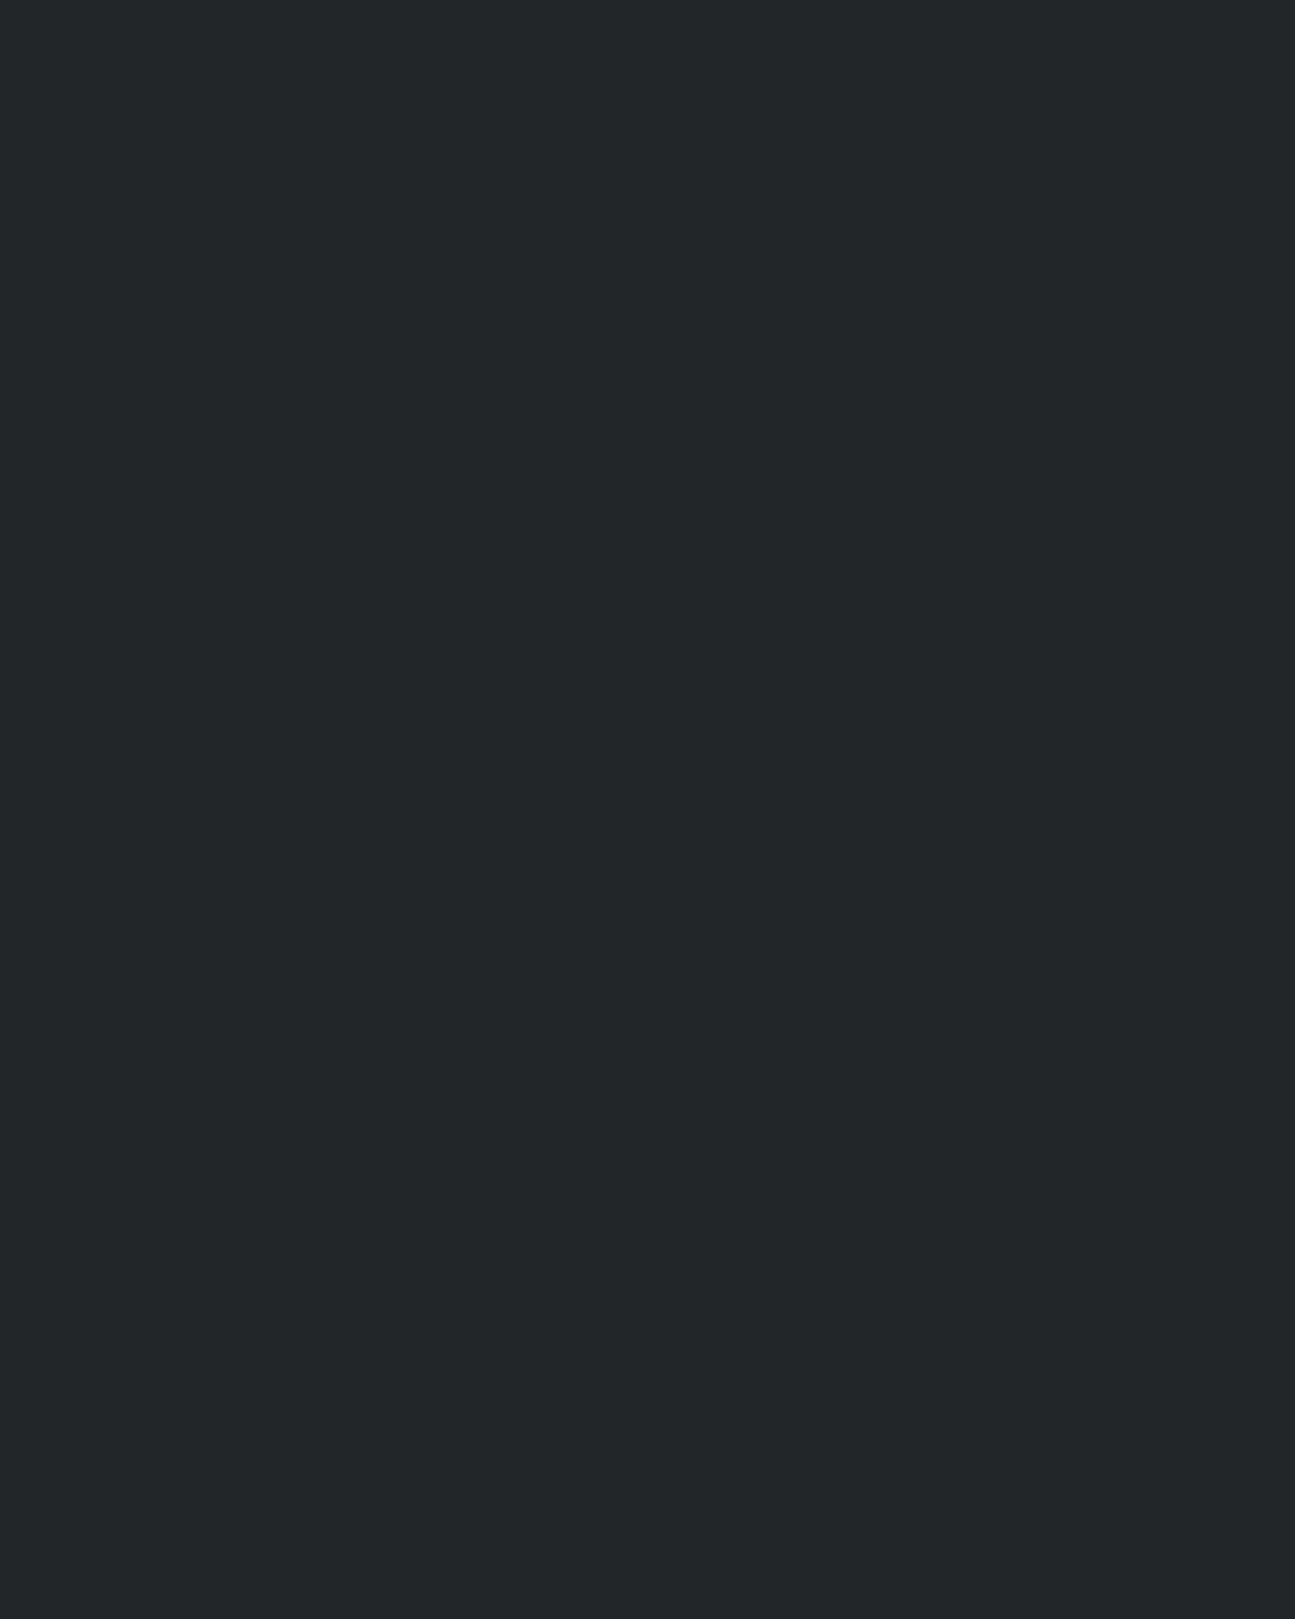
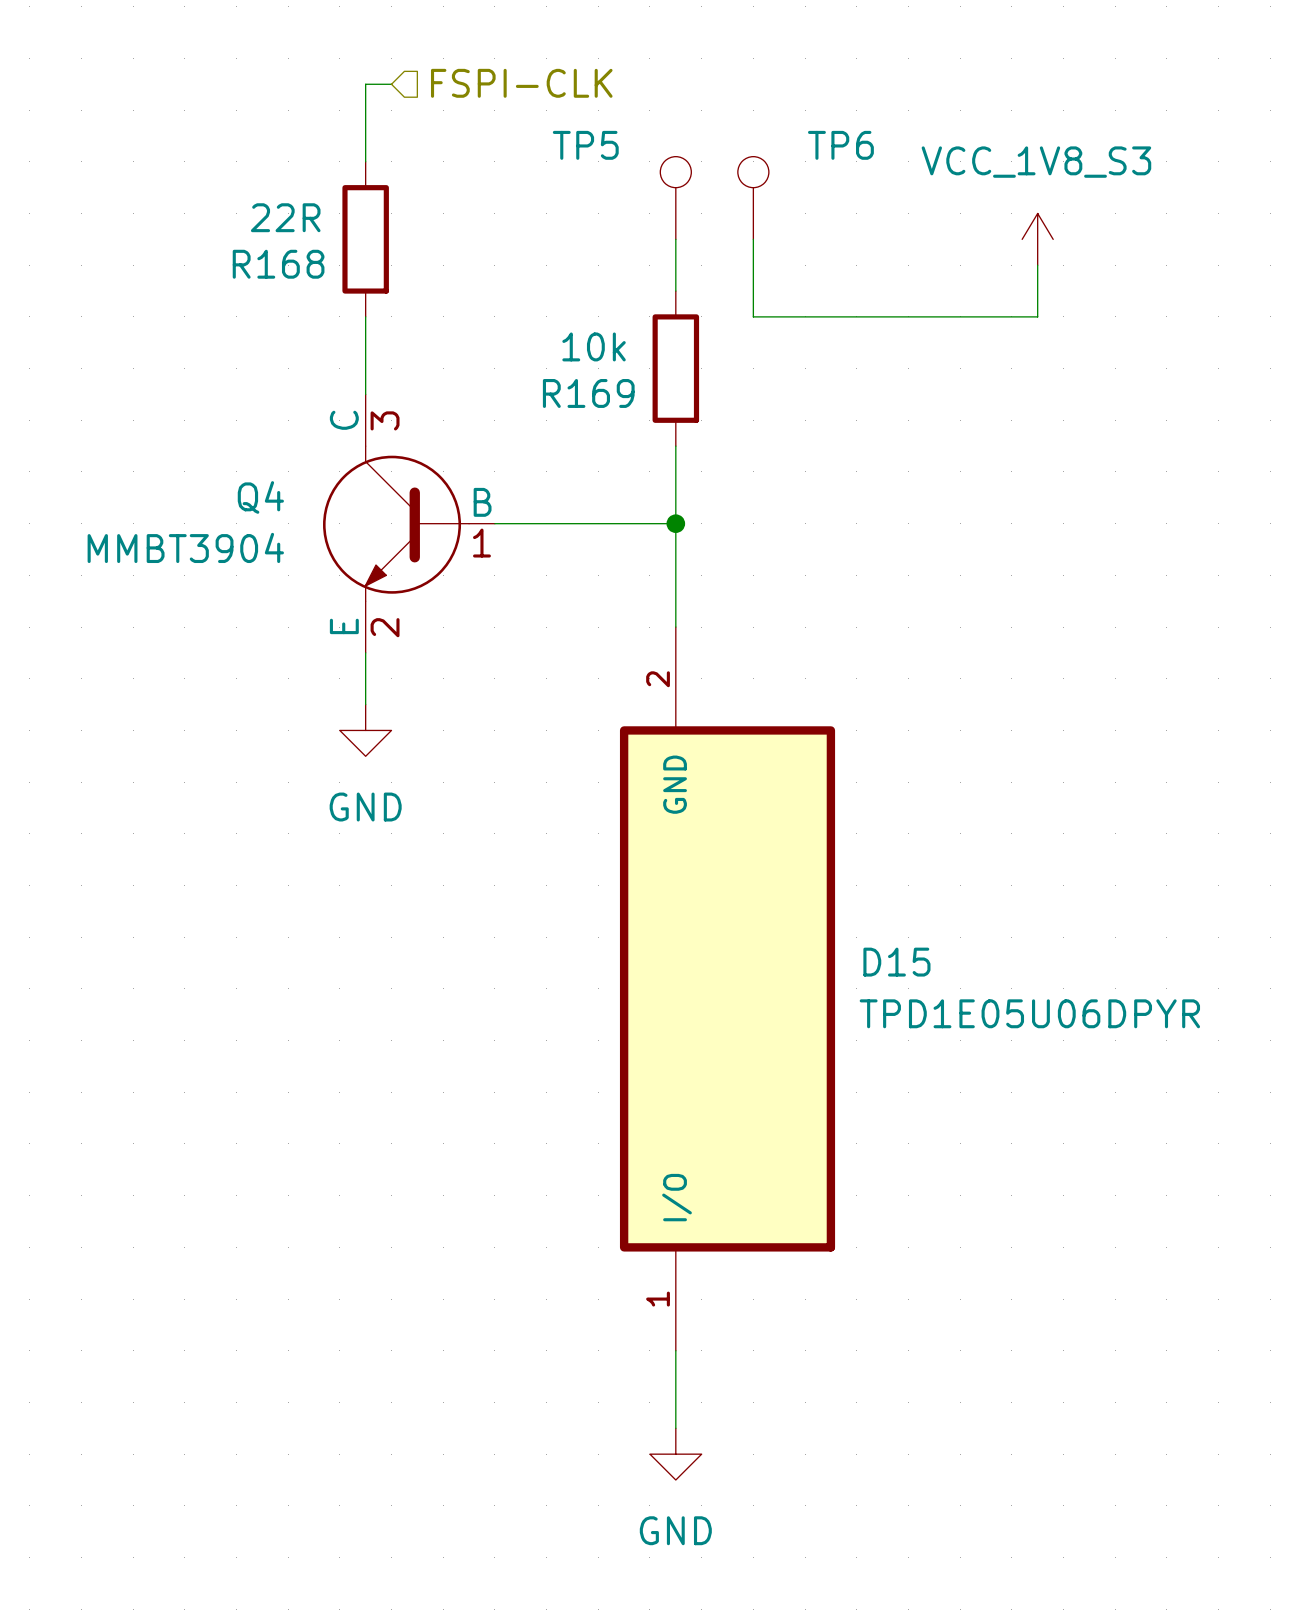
hierarchical label: none -> FSPI-CLK (521, 83)
wire: none -> (391, 84) (365, 84) (365, 161)
TP5: none -> (675, 198)
TP6: none -> (753, 198)
R168: none -> 22R (365, 239)
wire: none -> (675, 239) (675, 291)
wire: none -> (753, 239) (753, 316) (1037, 316) (1037, 265)
power symbol: none -> VCC_1V8_S3 (1037, 239)
wire: none -> (365, 316) (365, 394)
R169: none -> 10k (675, 368)
wire: none -> (675, 446) (675, 627)
Q4: none -> MMBT3904 (408, 523)
wire: none -> (494, 523) (675, 523)
junction: none -> (675, 523)
wire: none -> (365, 652) (365, 704)
power symbol: none -> GND (365, 730)
D15: none -> TPD1E05U06DPYR (727, 988)
wire: none -> (675, 1350) (675, 1428)
power symbol: none -> GND (675, 1454)

